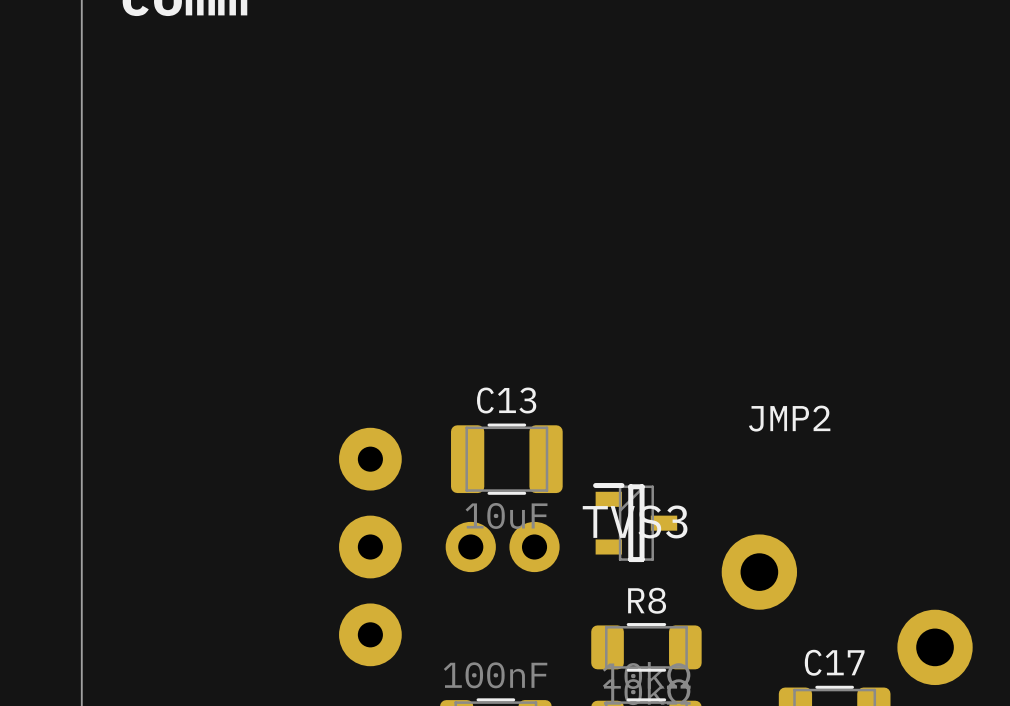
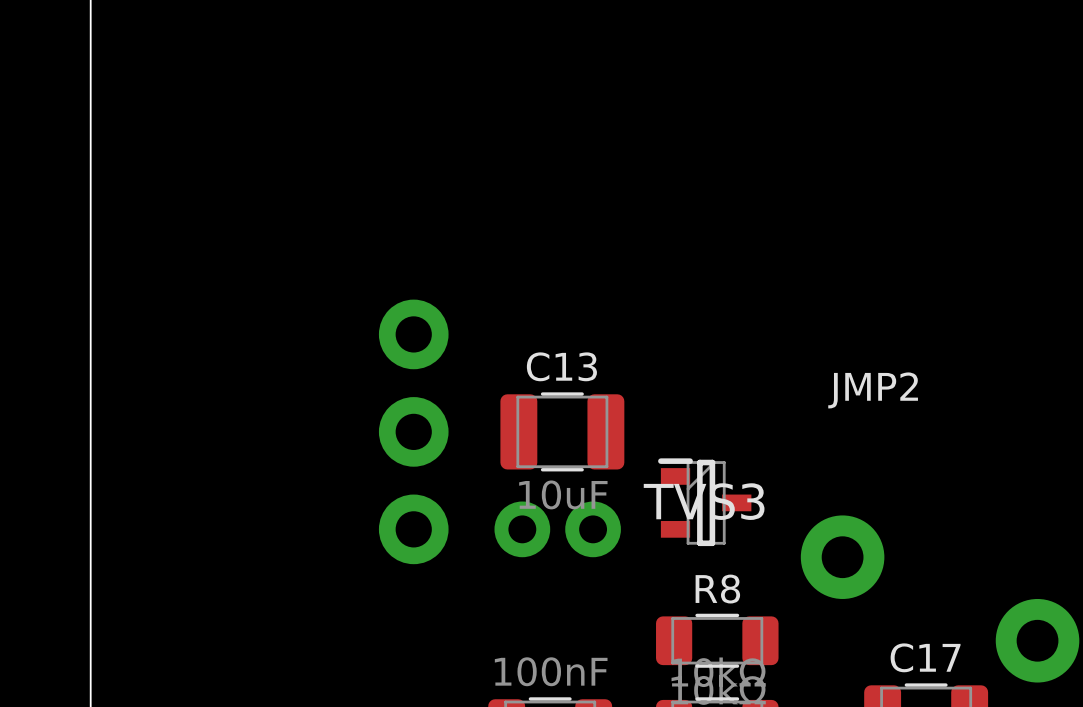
part: none -> (413, 431)
part: (370, 547) -> none

